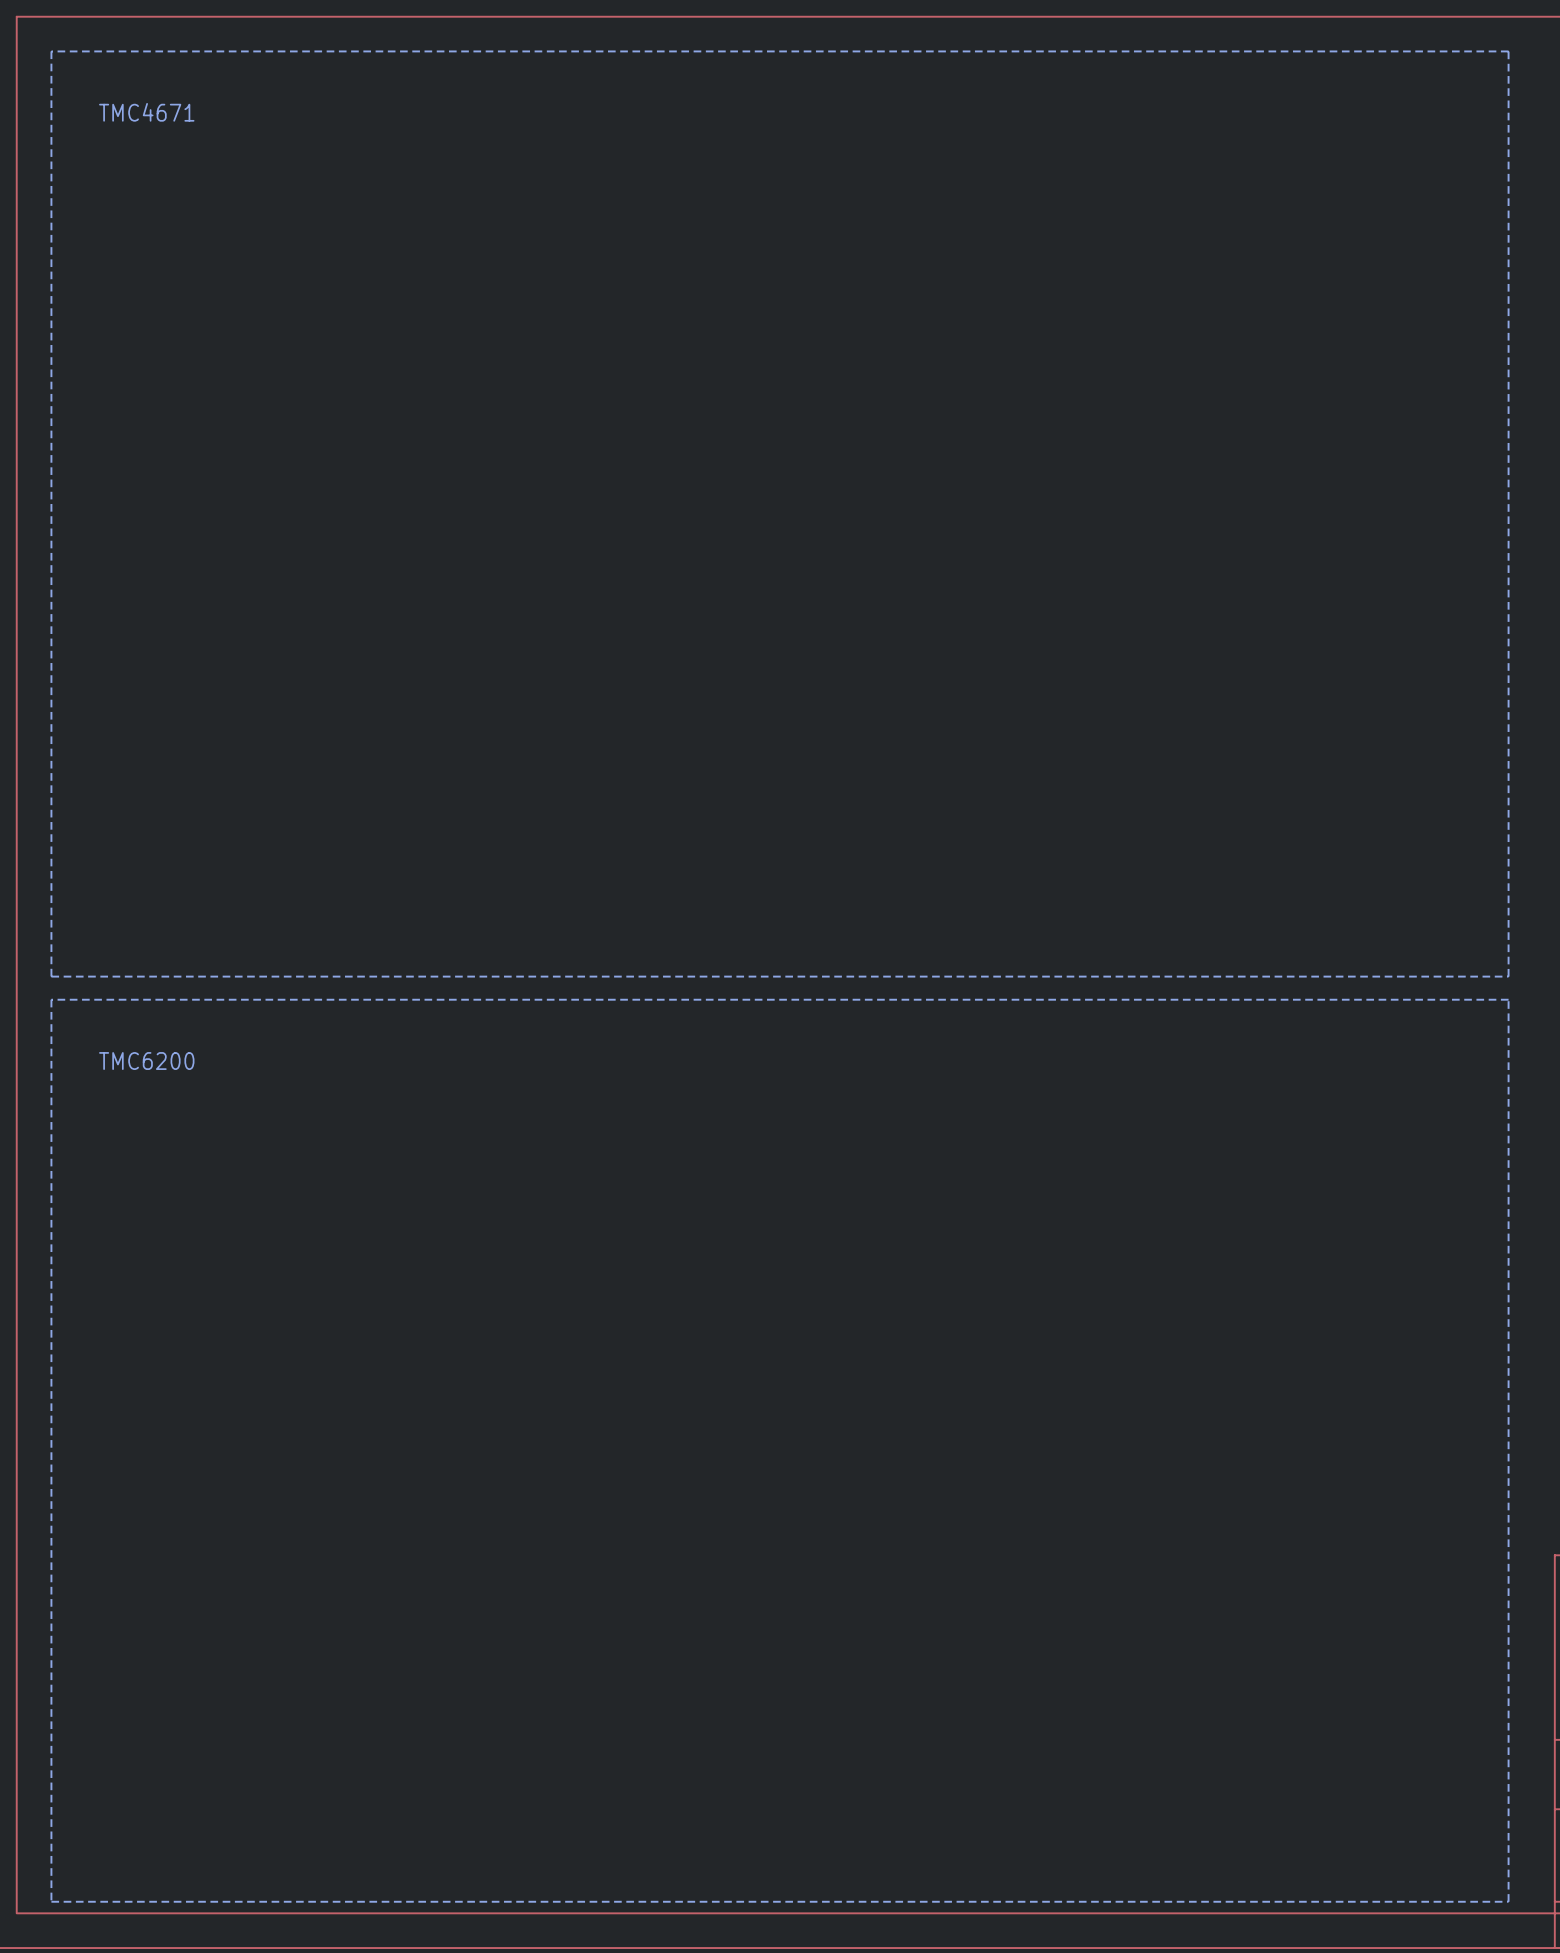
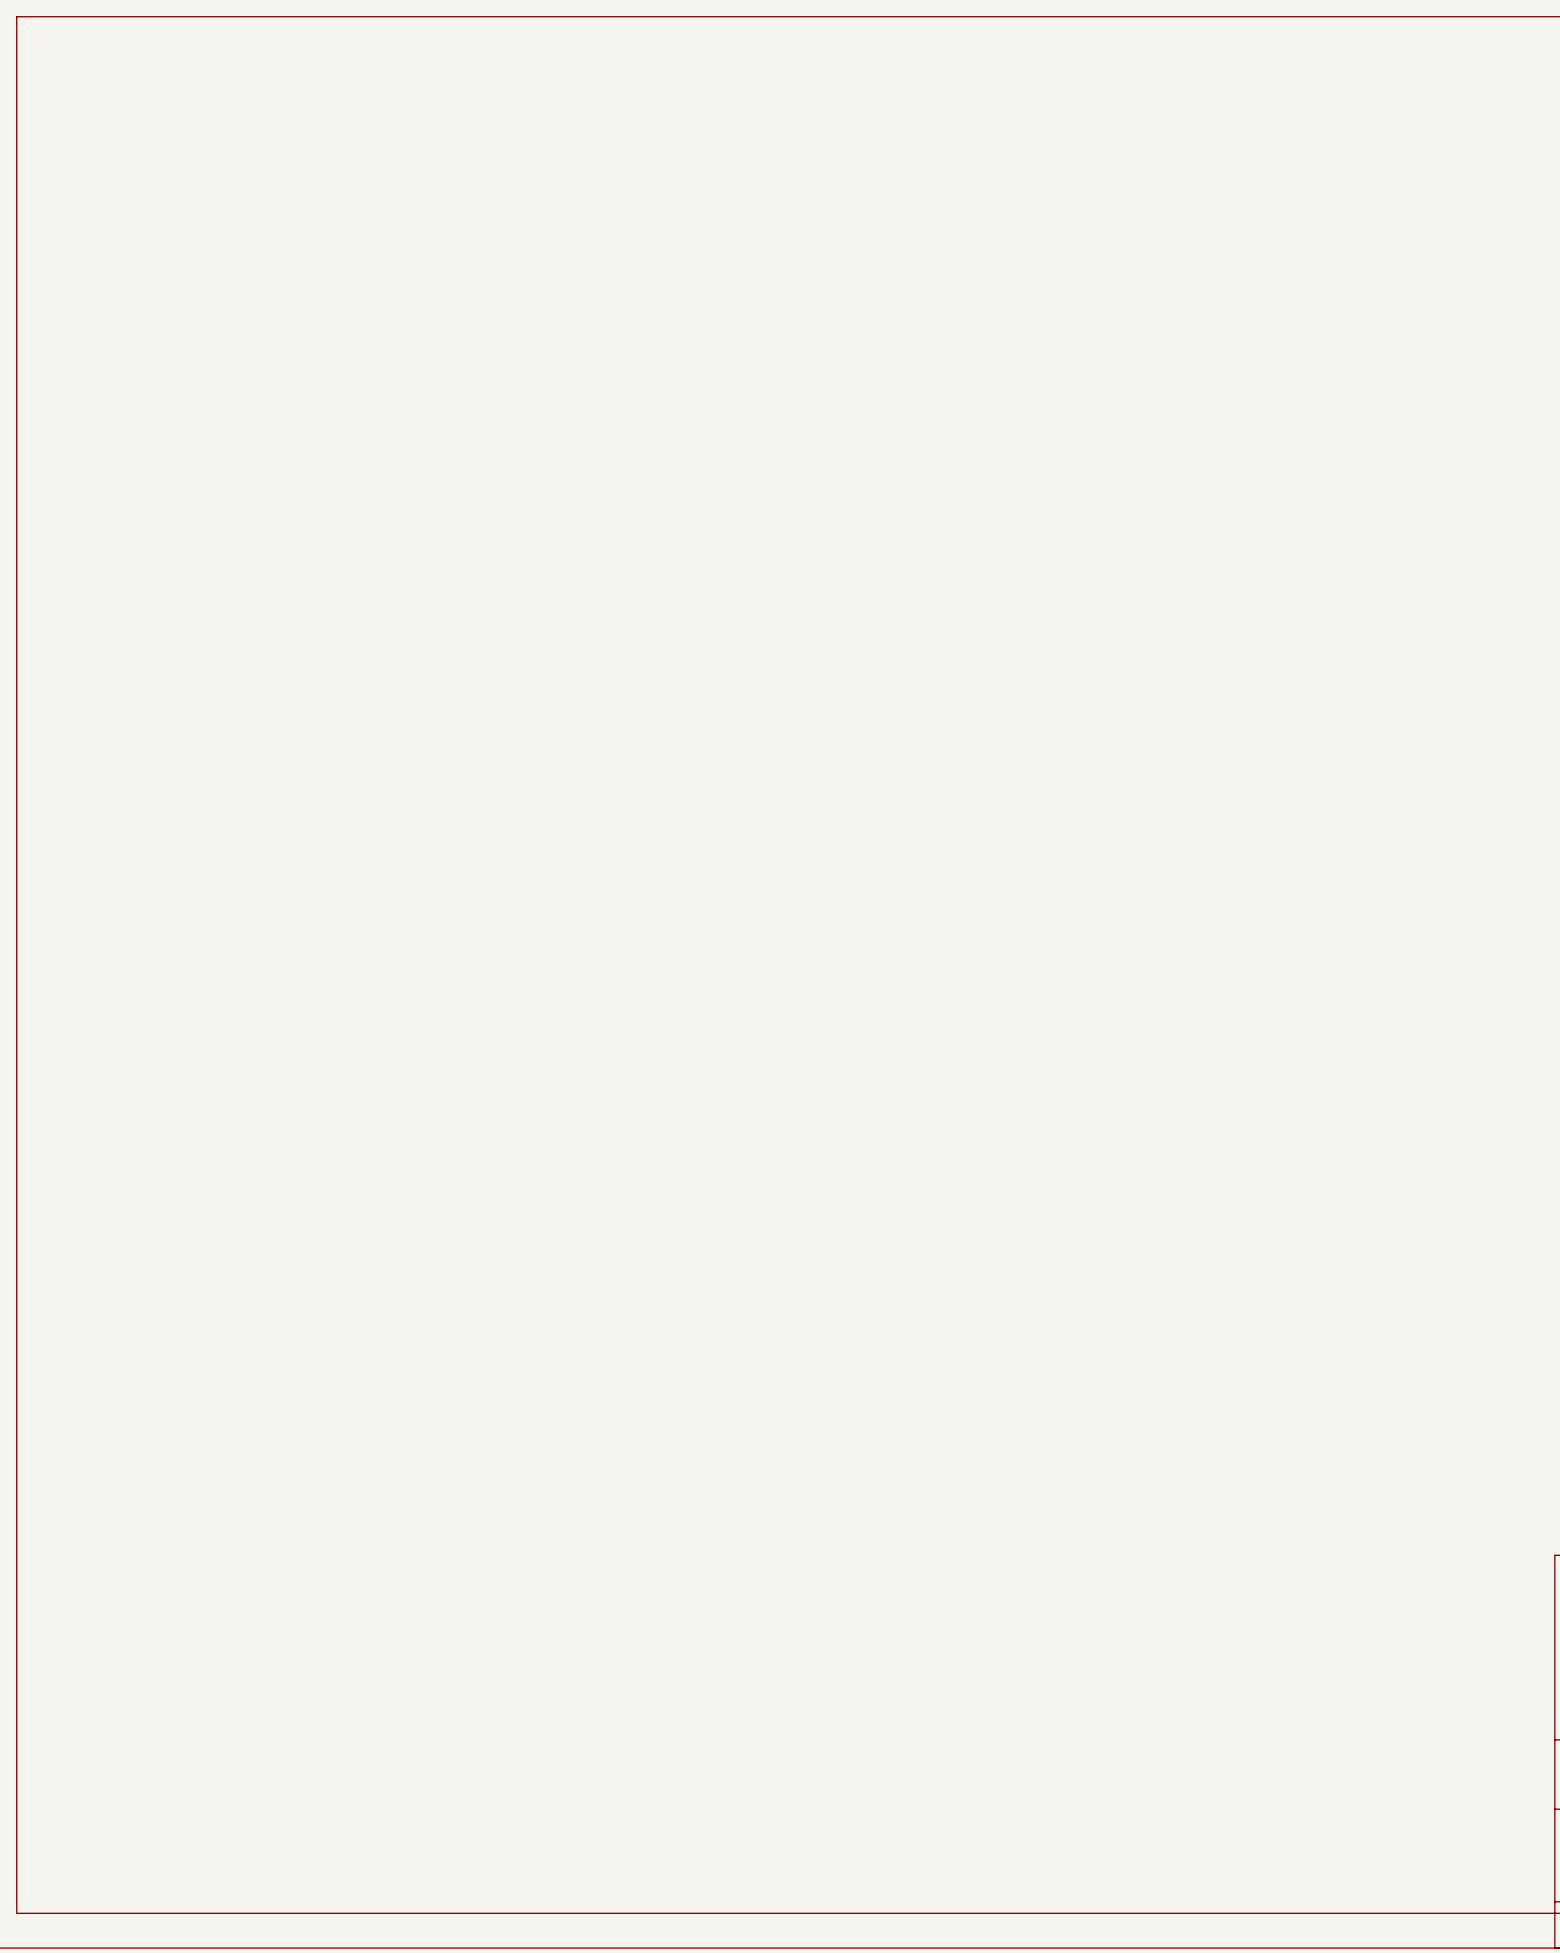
line: (51, 51) (51, 976) (1508, 976) (1508, 51) (51, 51) -> none
text: TMC4671 (146, 112) -> none
line: (51, 999) (51, 1901) (1508, 1901) (1508, 999) (51, 999) -> none
text: TMC6200 (146, 1061) -> none

